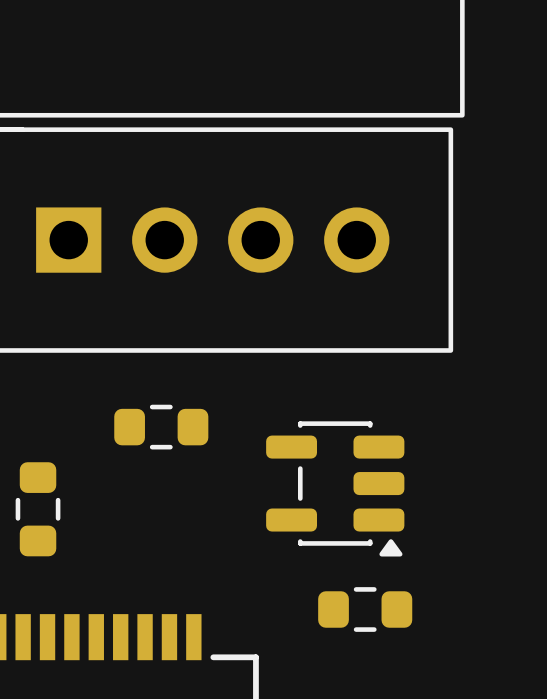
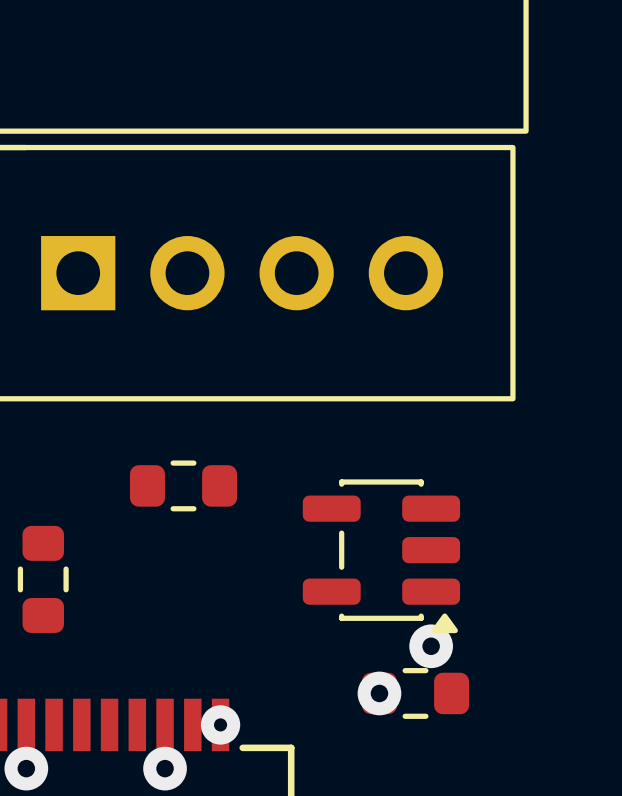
via: none -> (431, 646)
via: none -> (379, 693)
via: none -> (220, 724)
via: none -> (26, 768)
via: none -> (165, 768)

